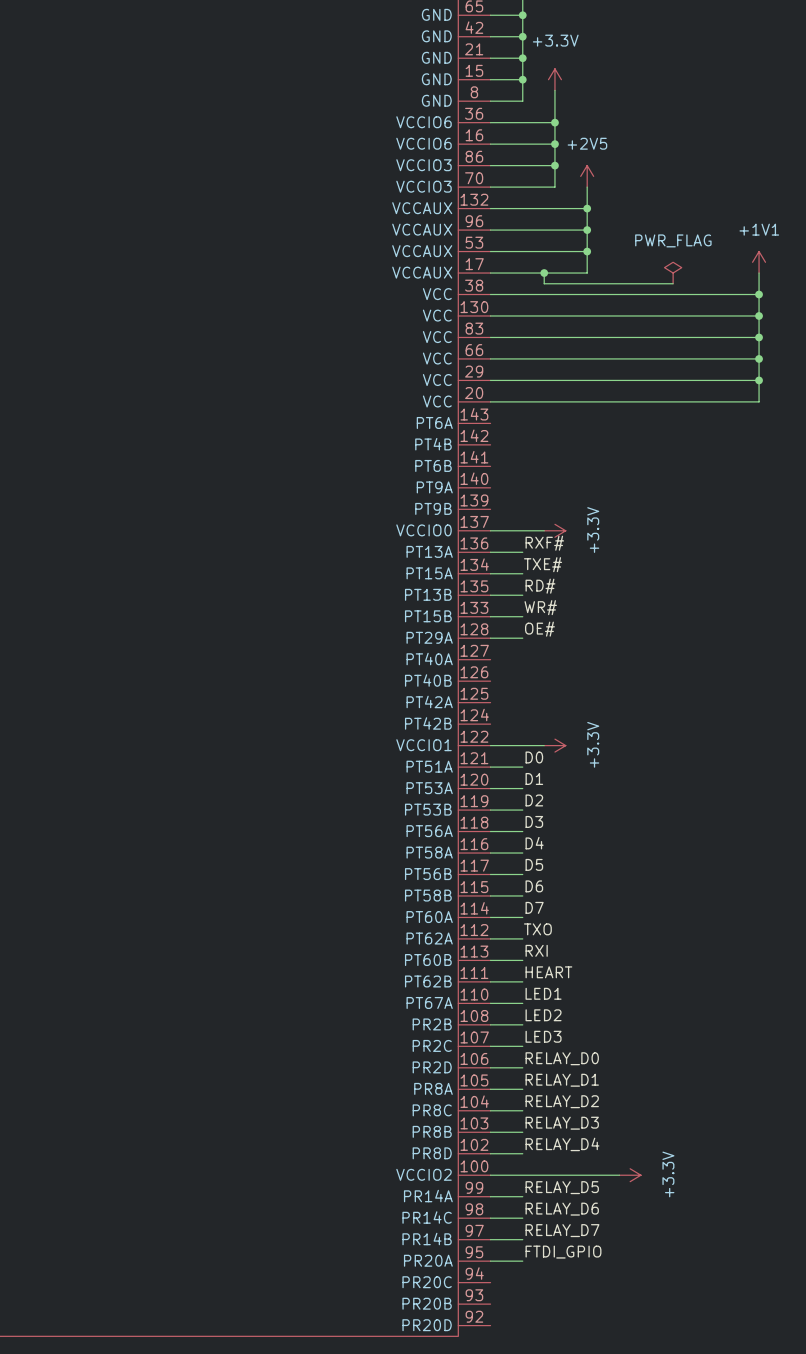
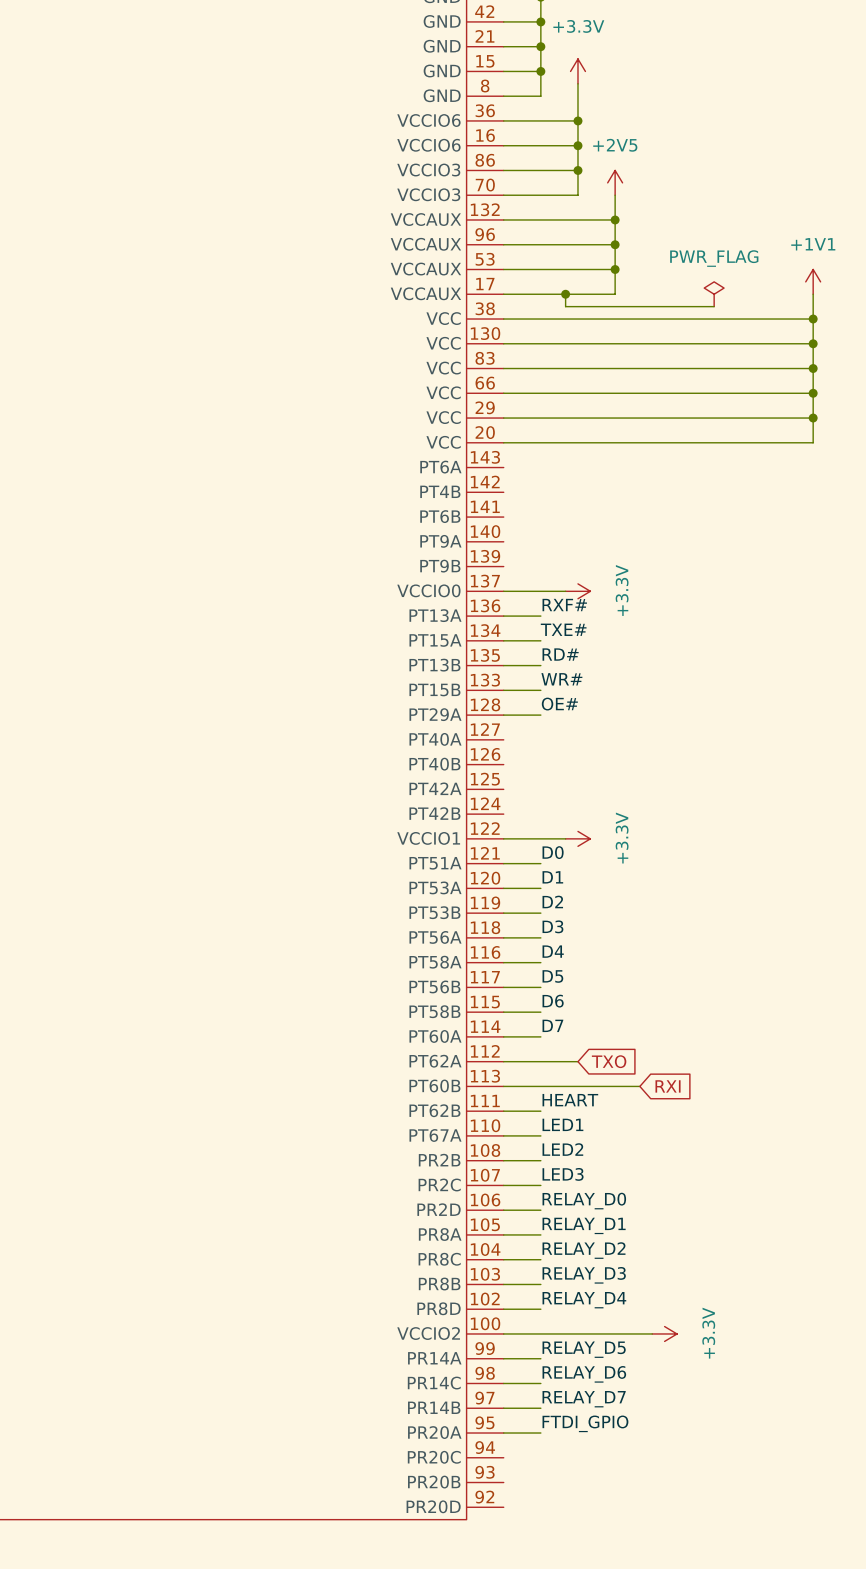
label: TXO (537, 929) -> none
wire: none -> (540, 1061) (577, 1061)
global label: none -> TXO (609, 1061)
label: RXI (536, 950) -> none
wire: none -> (540, 1086) (639, 1086)
global label: none -> RXI (668, 1086)

